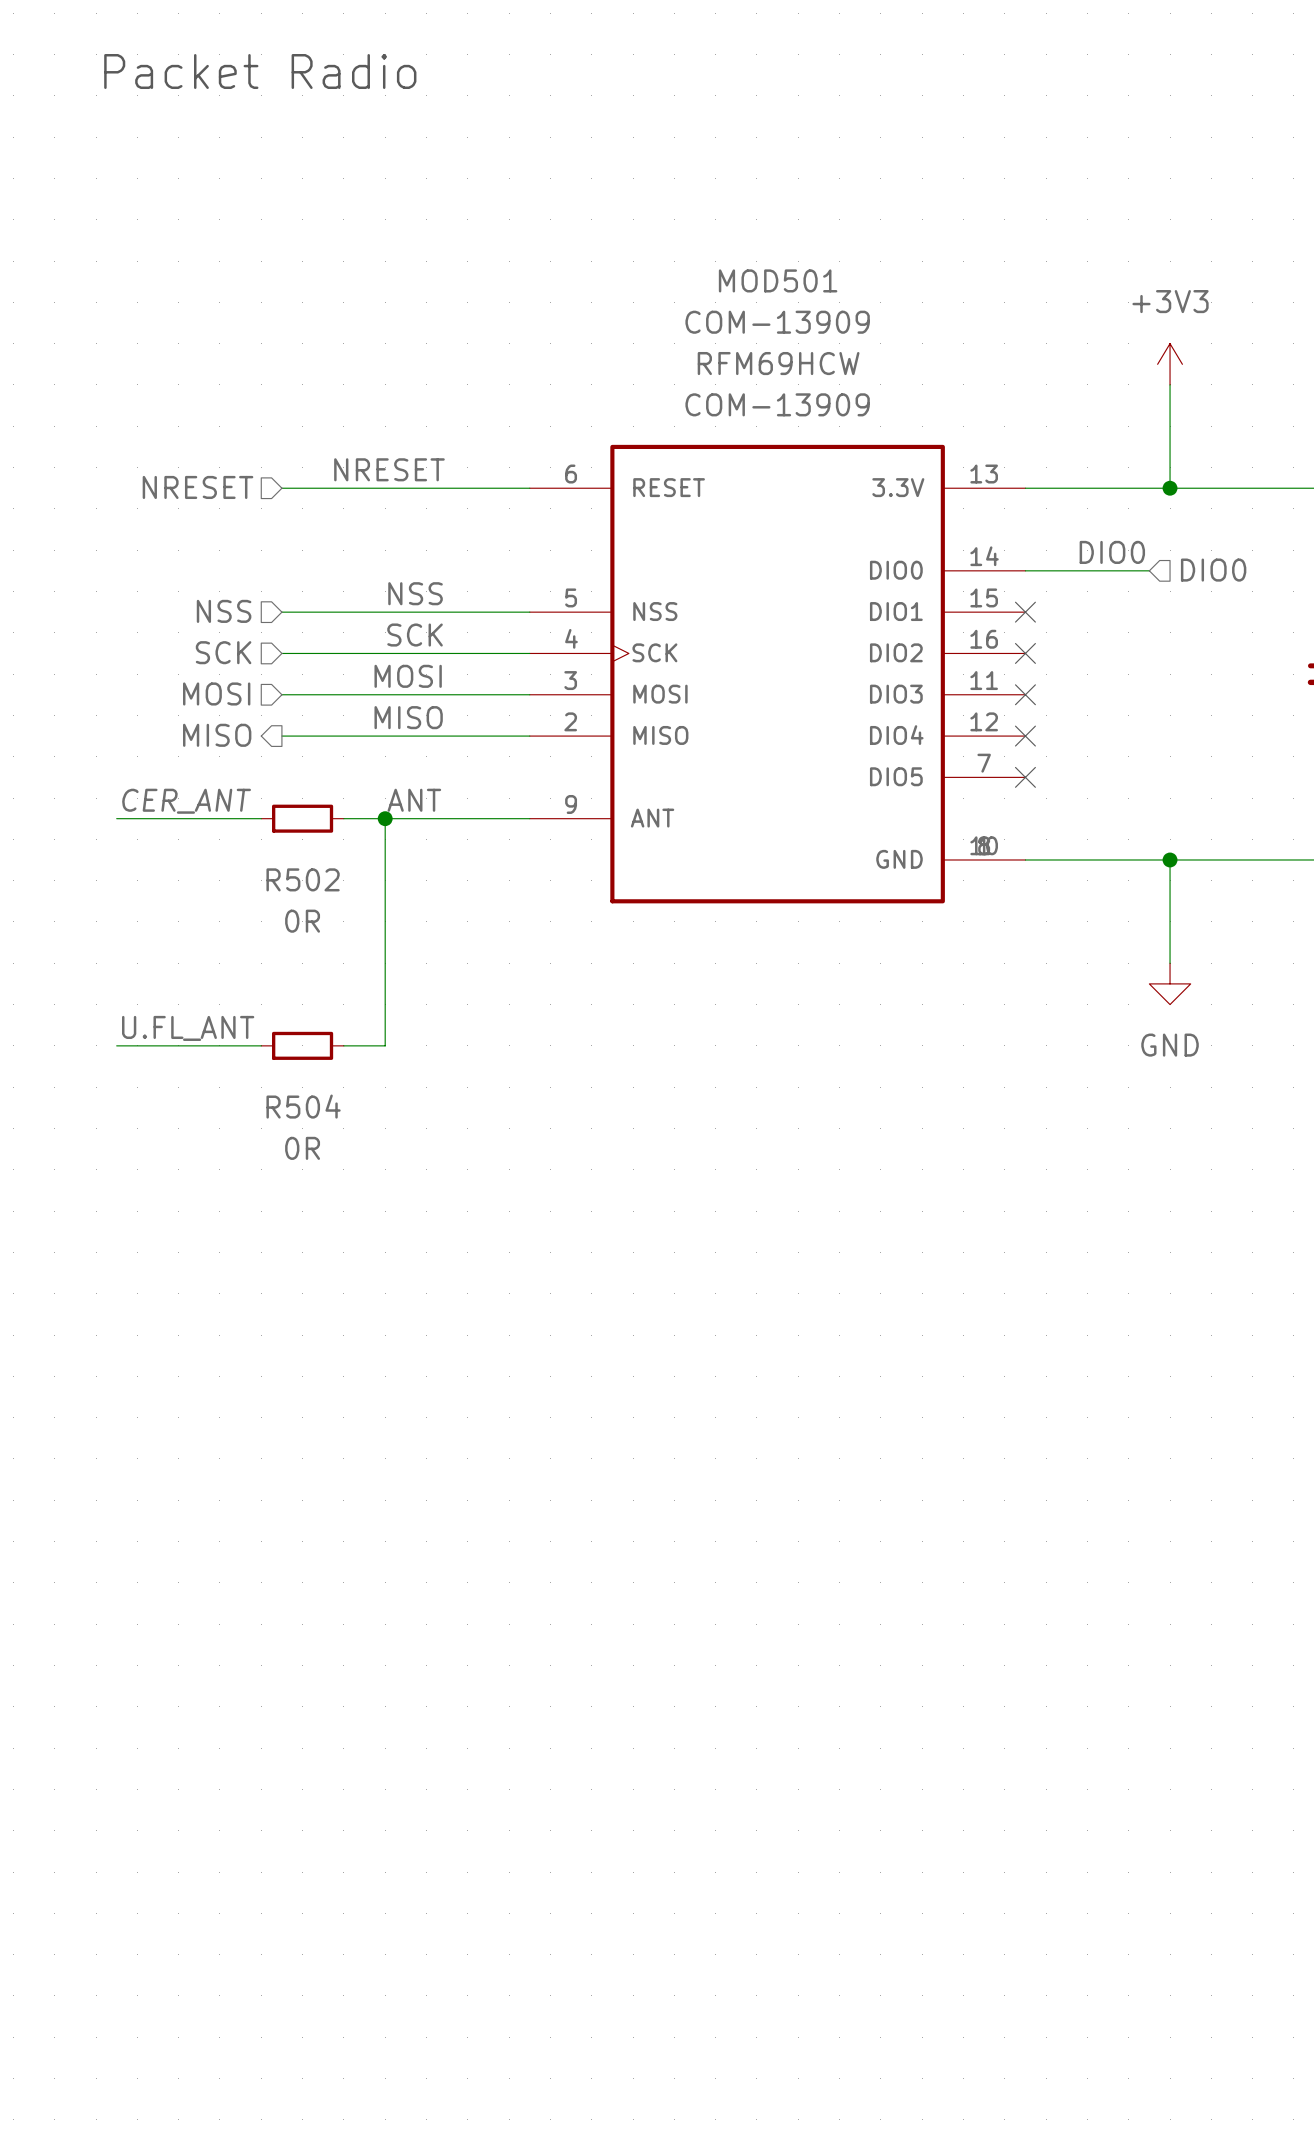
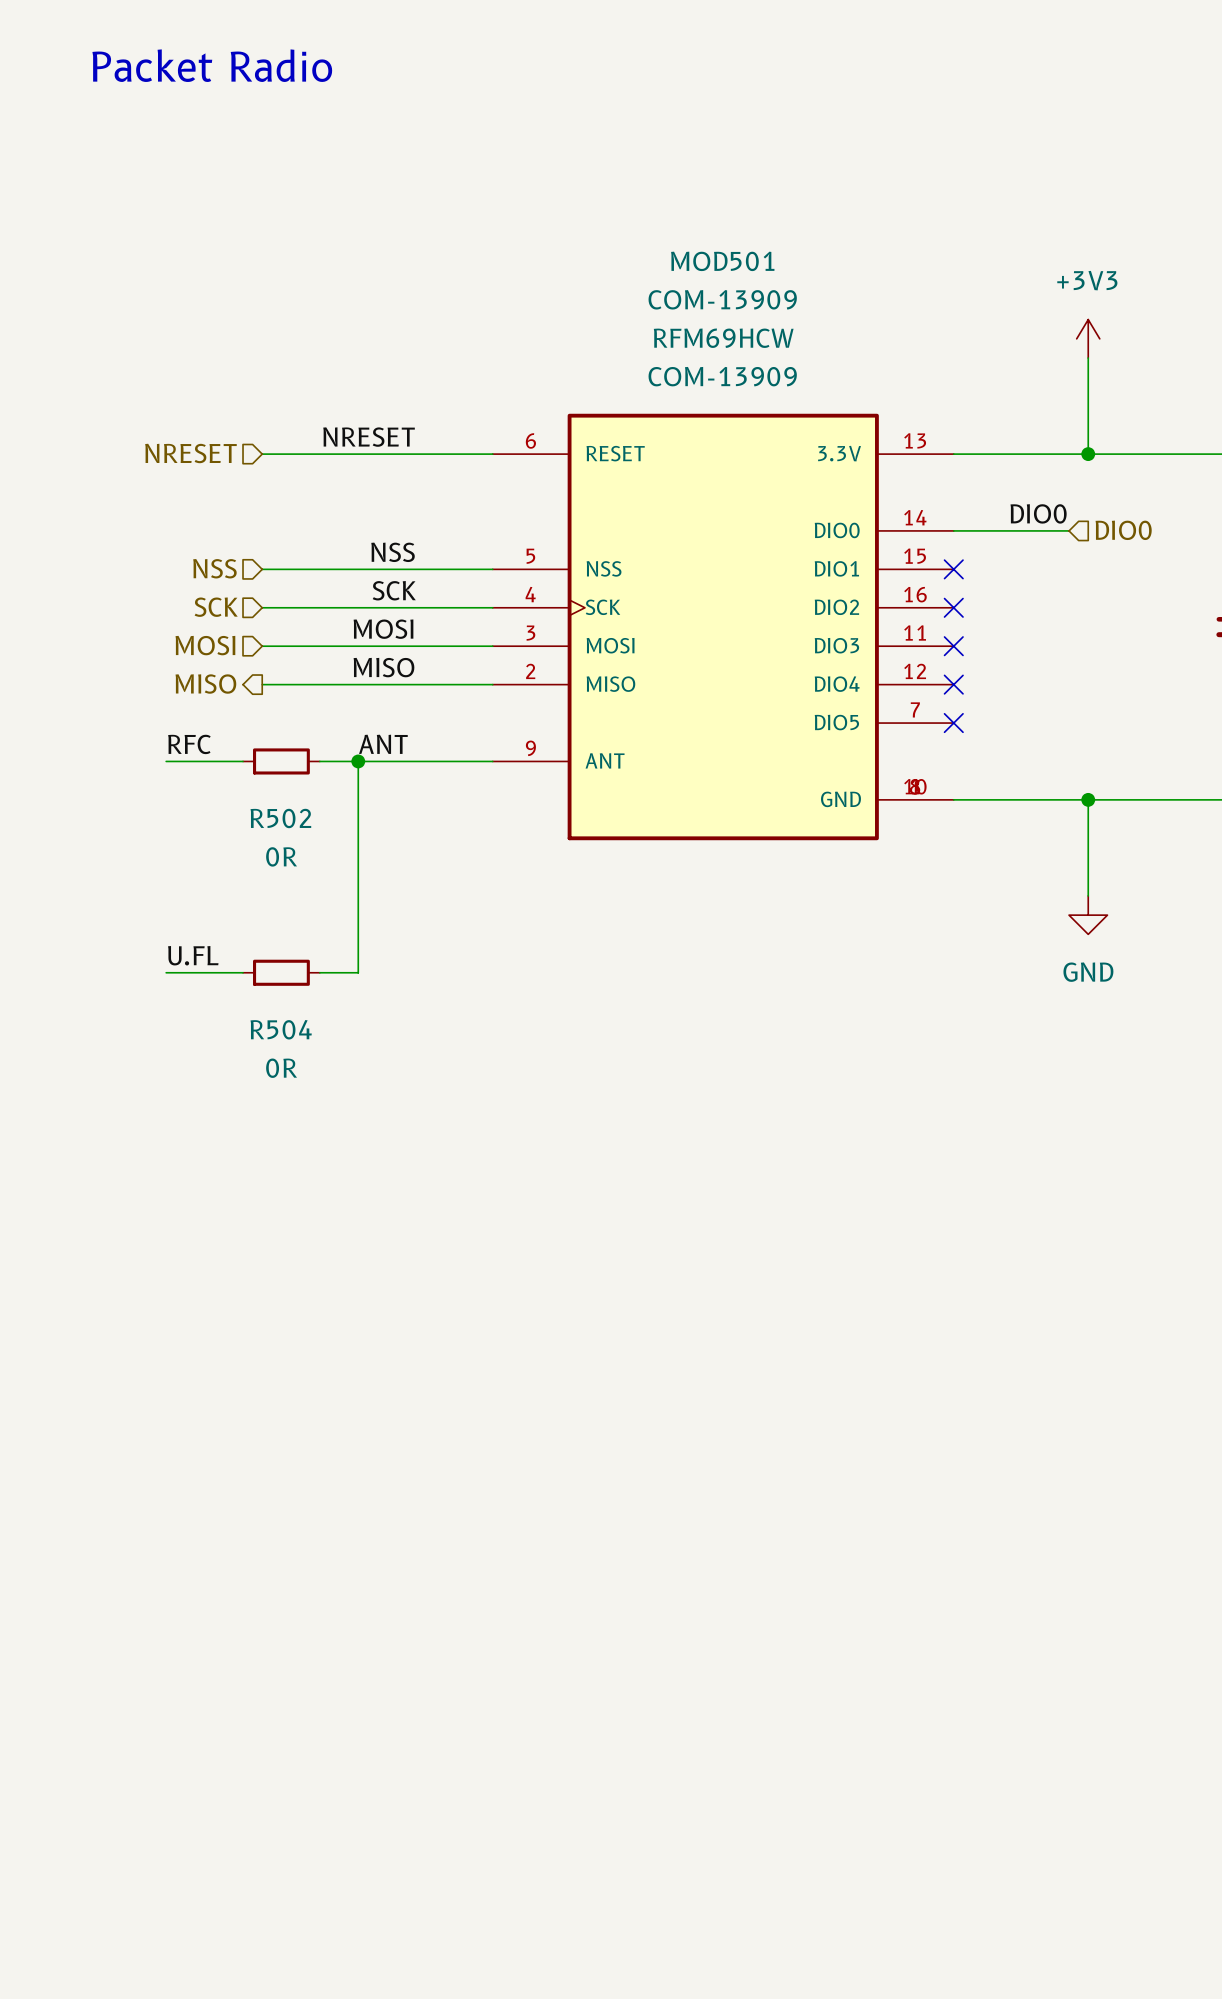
label: none -> RFC (189, 744)
label: CER_ANT (186, 801) -> none
wire: (116, 818) (178, 818) -> none
label: U.FL_ANT (188, 1028) -> U.FL (193, 955)
wire: (116, 1045) (178, 1045) -> none

